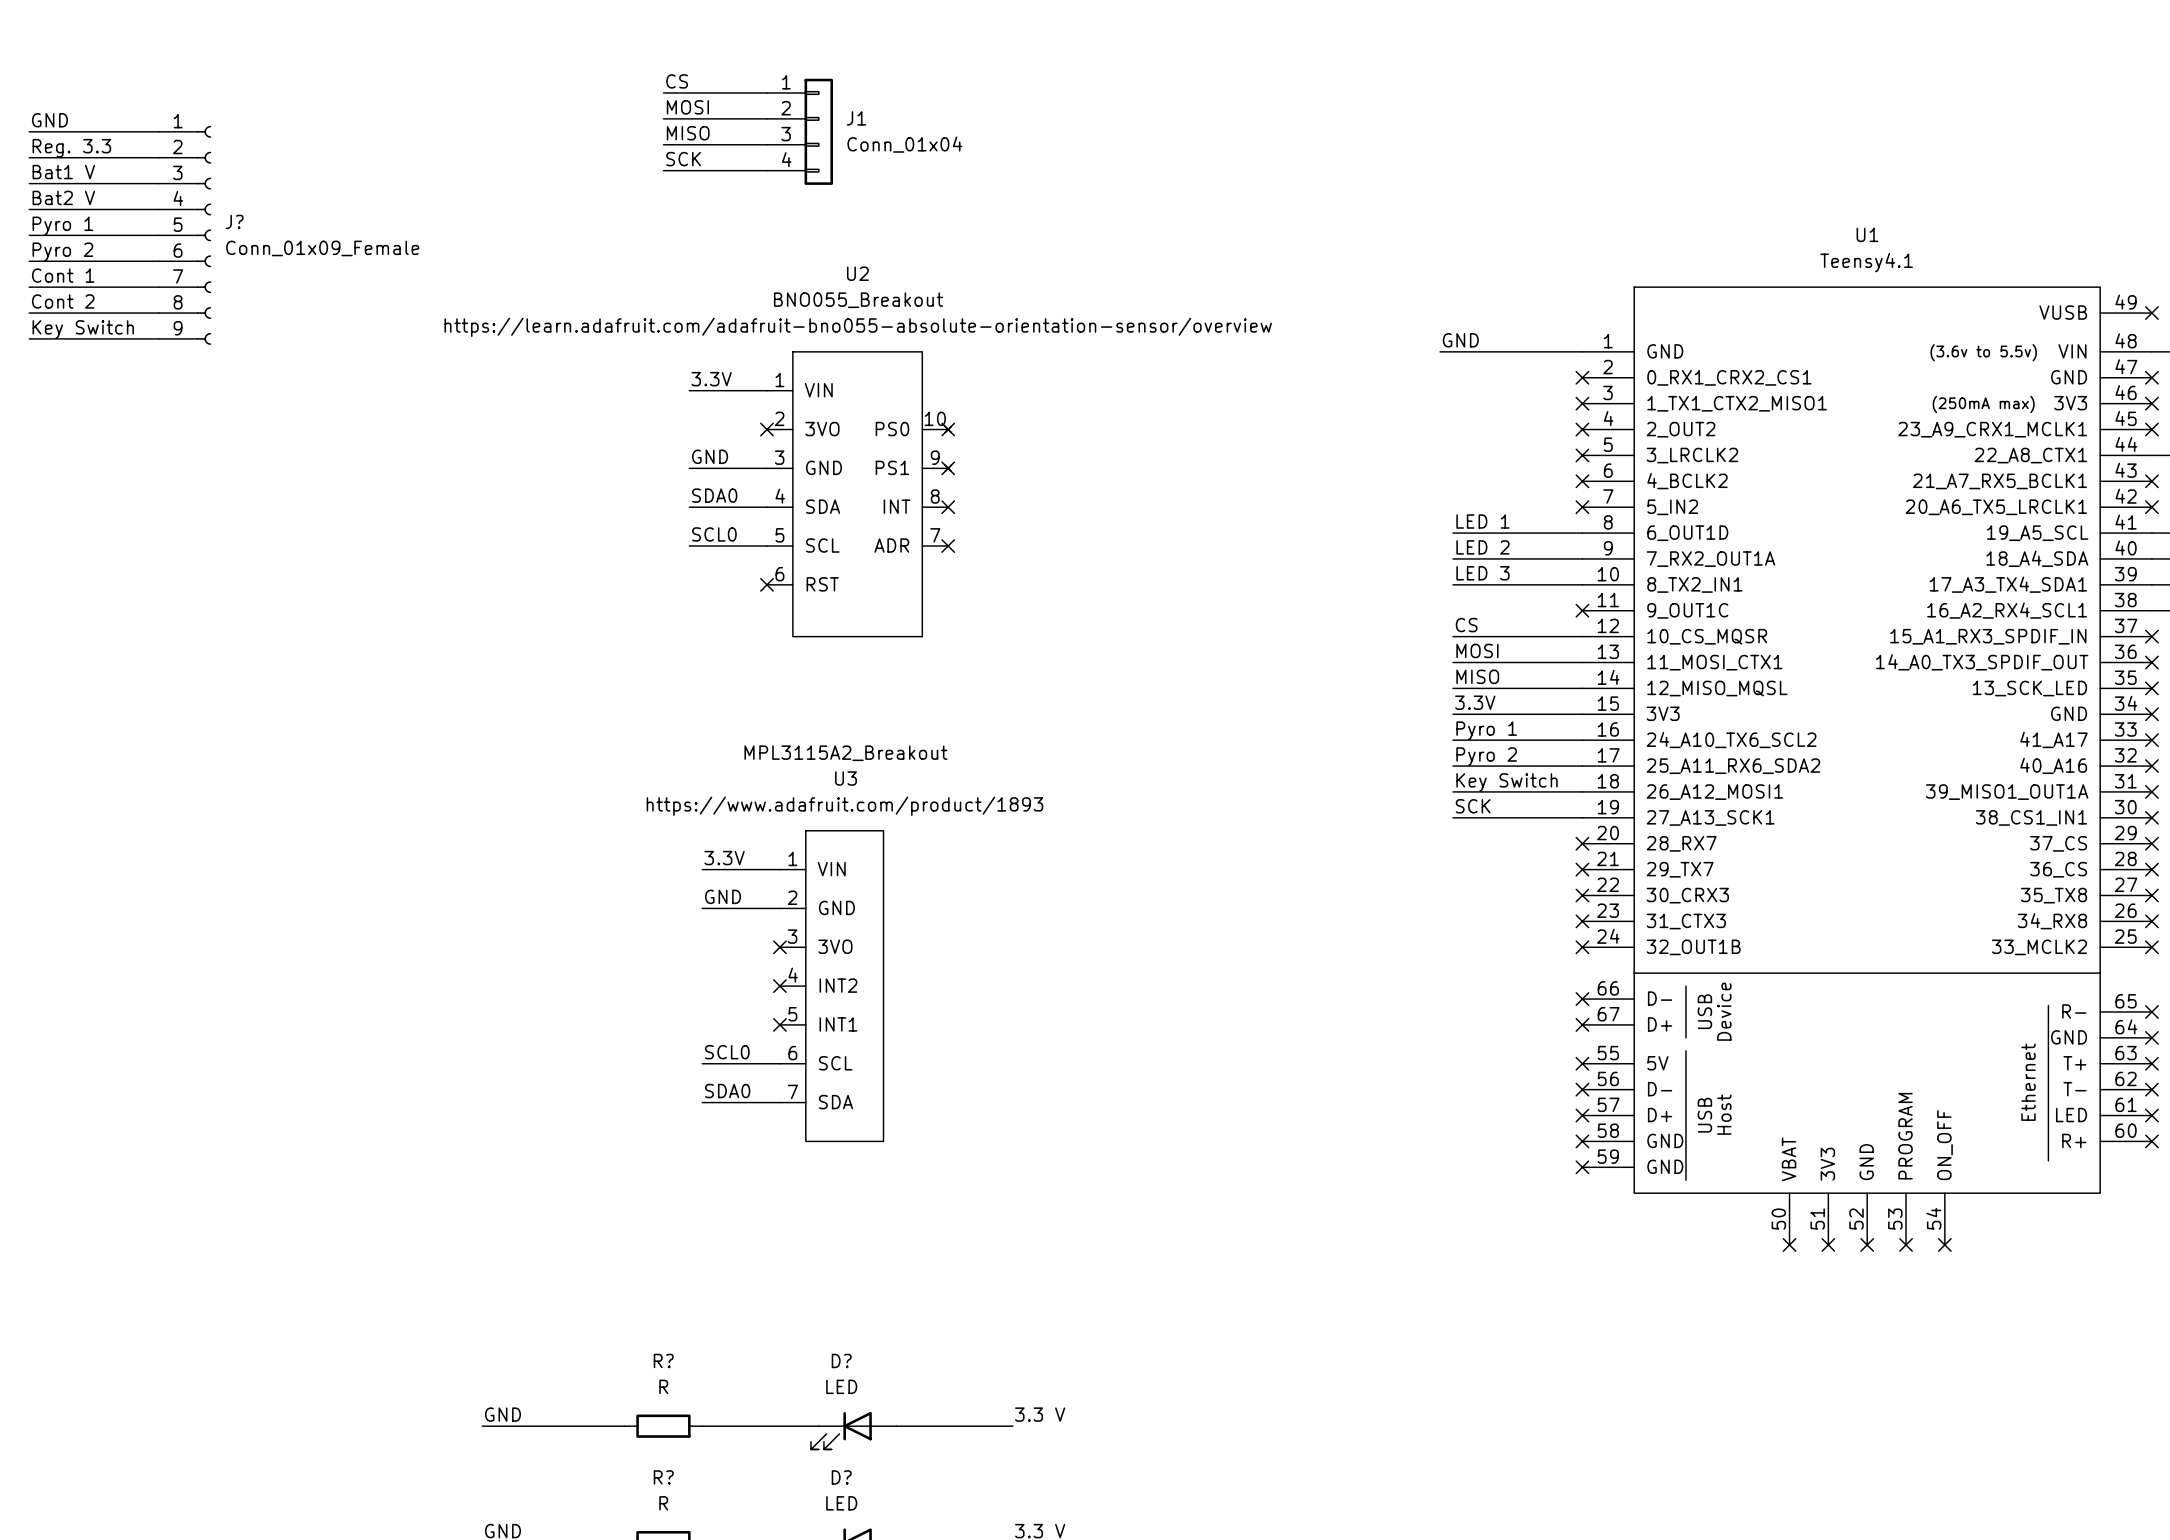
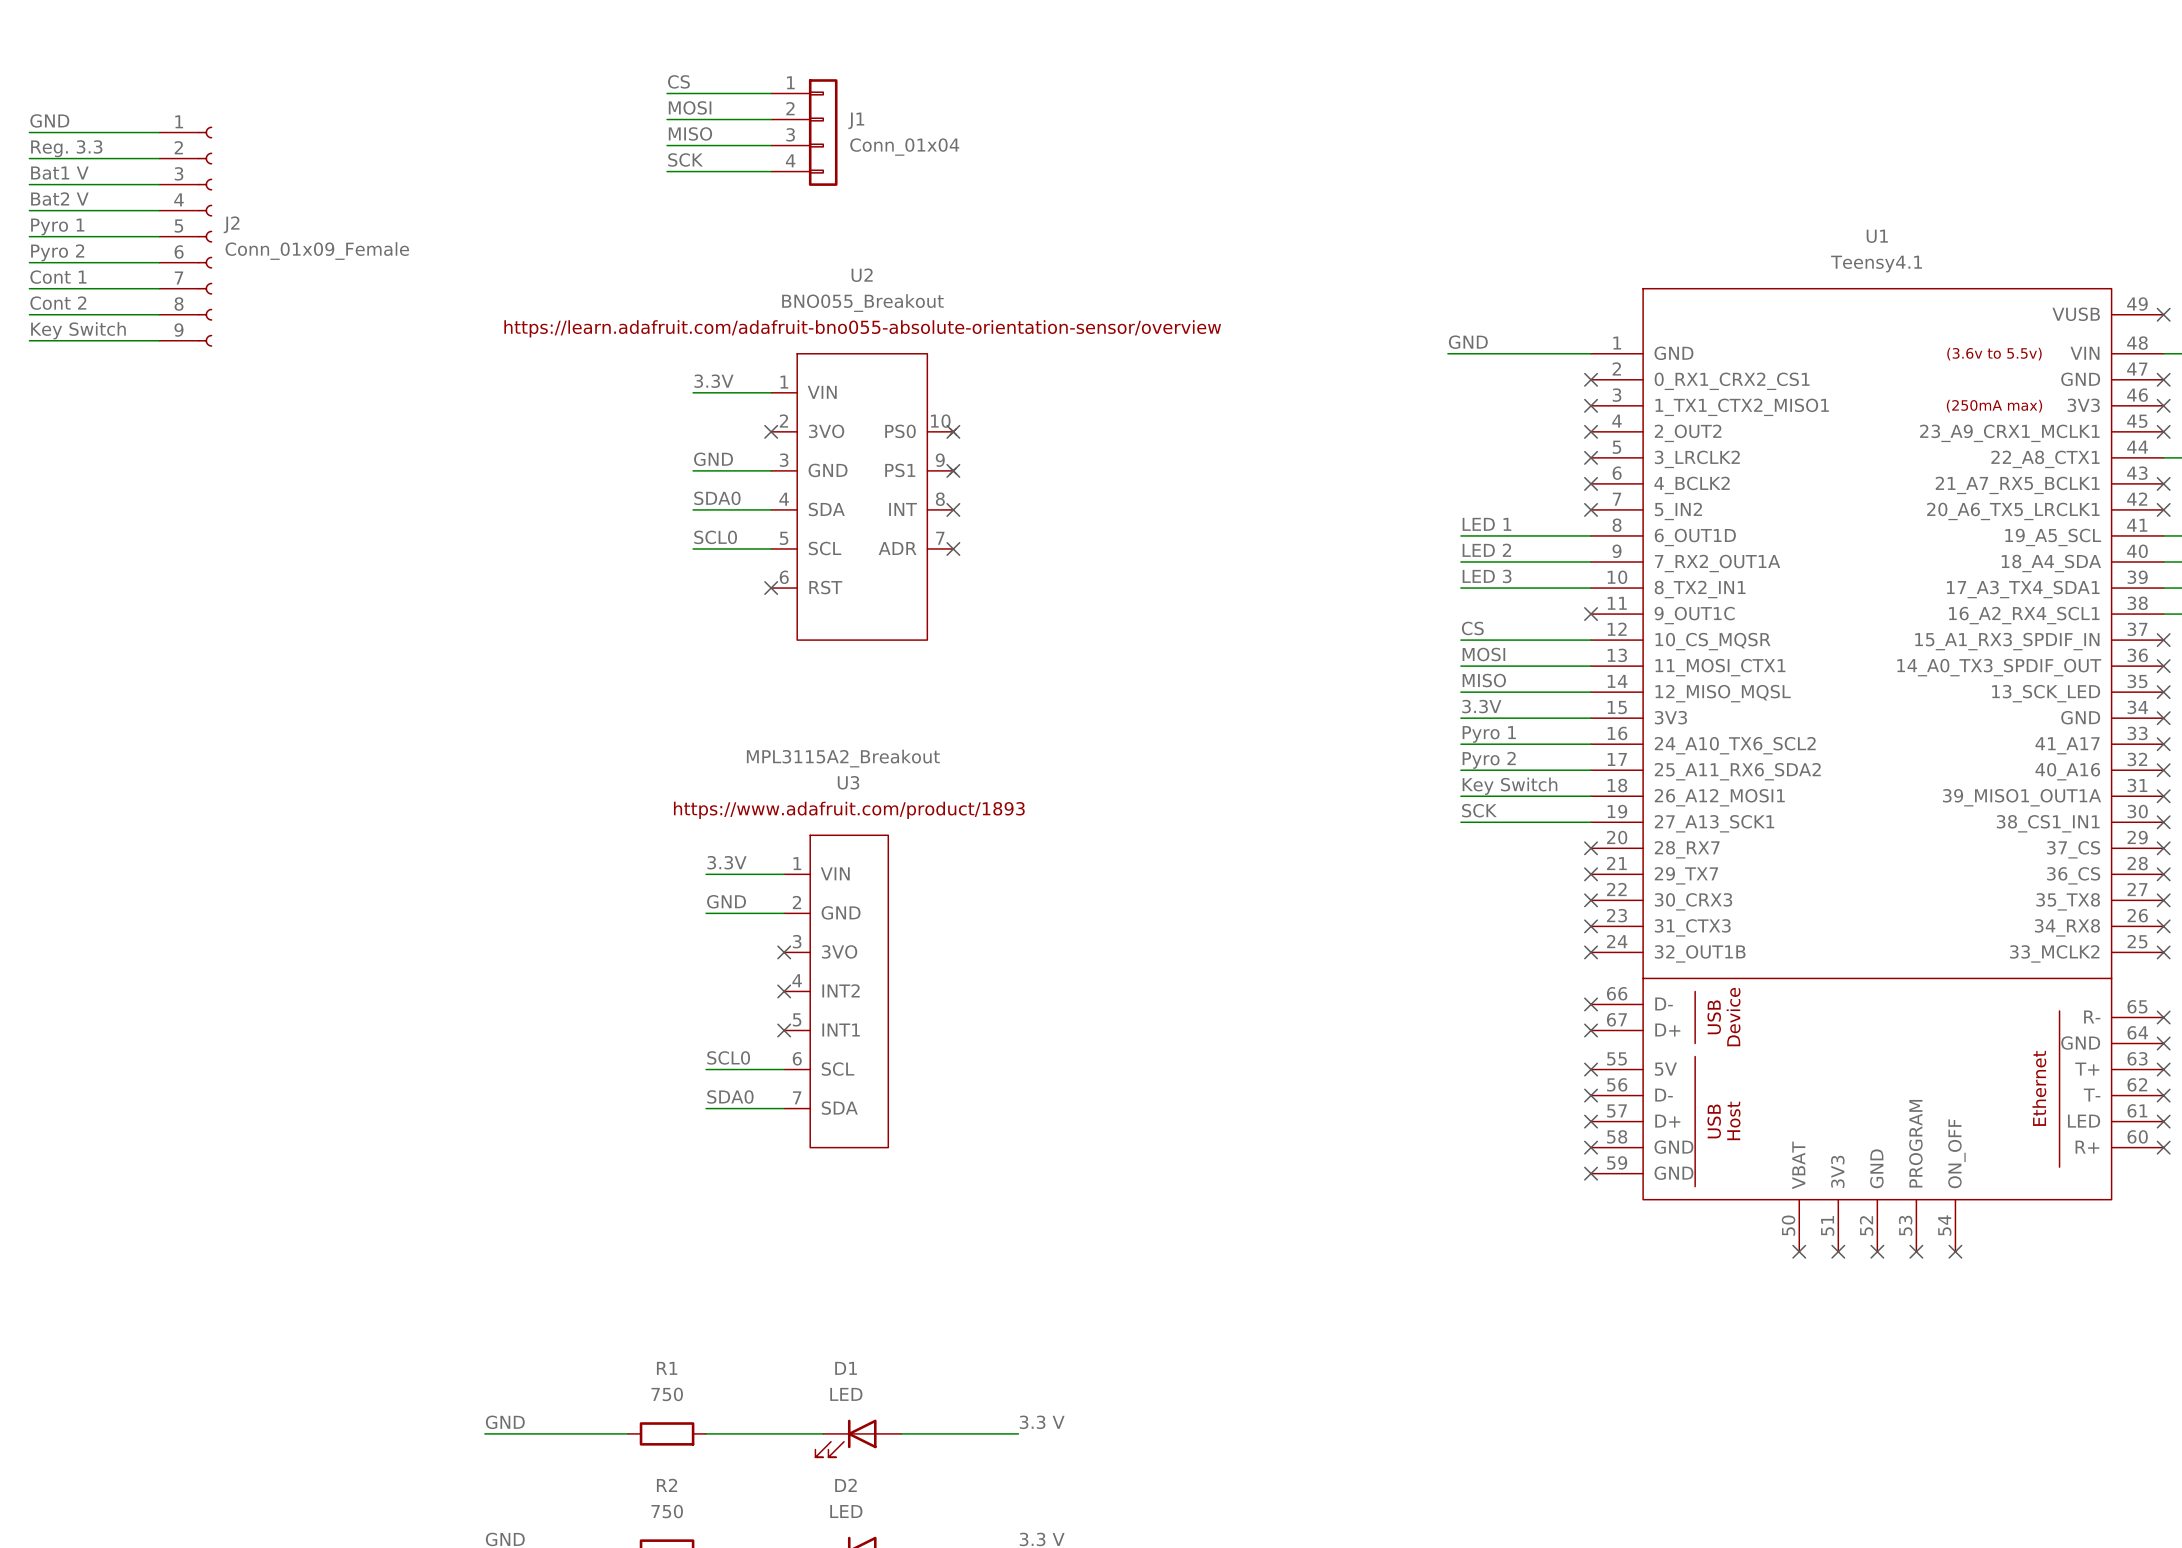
J? name: J? (234, 221) -> J2 (231, 224)
R? name: R? (663, 1360) -> R1 (667, 1368)
D? name: D? (841, 1360) -> D1 (846, 1368)
R? value: R (663, 1386) -> 750 (667, 1394)
R? name: R? (663, 1477) -> R2 (667, 1485)
D? name: D? (841, 1477) -> D2 (845, 1485)
R? value: R (663, 1503) -> 750 (667, 1511)

